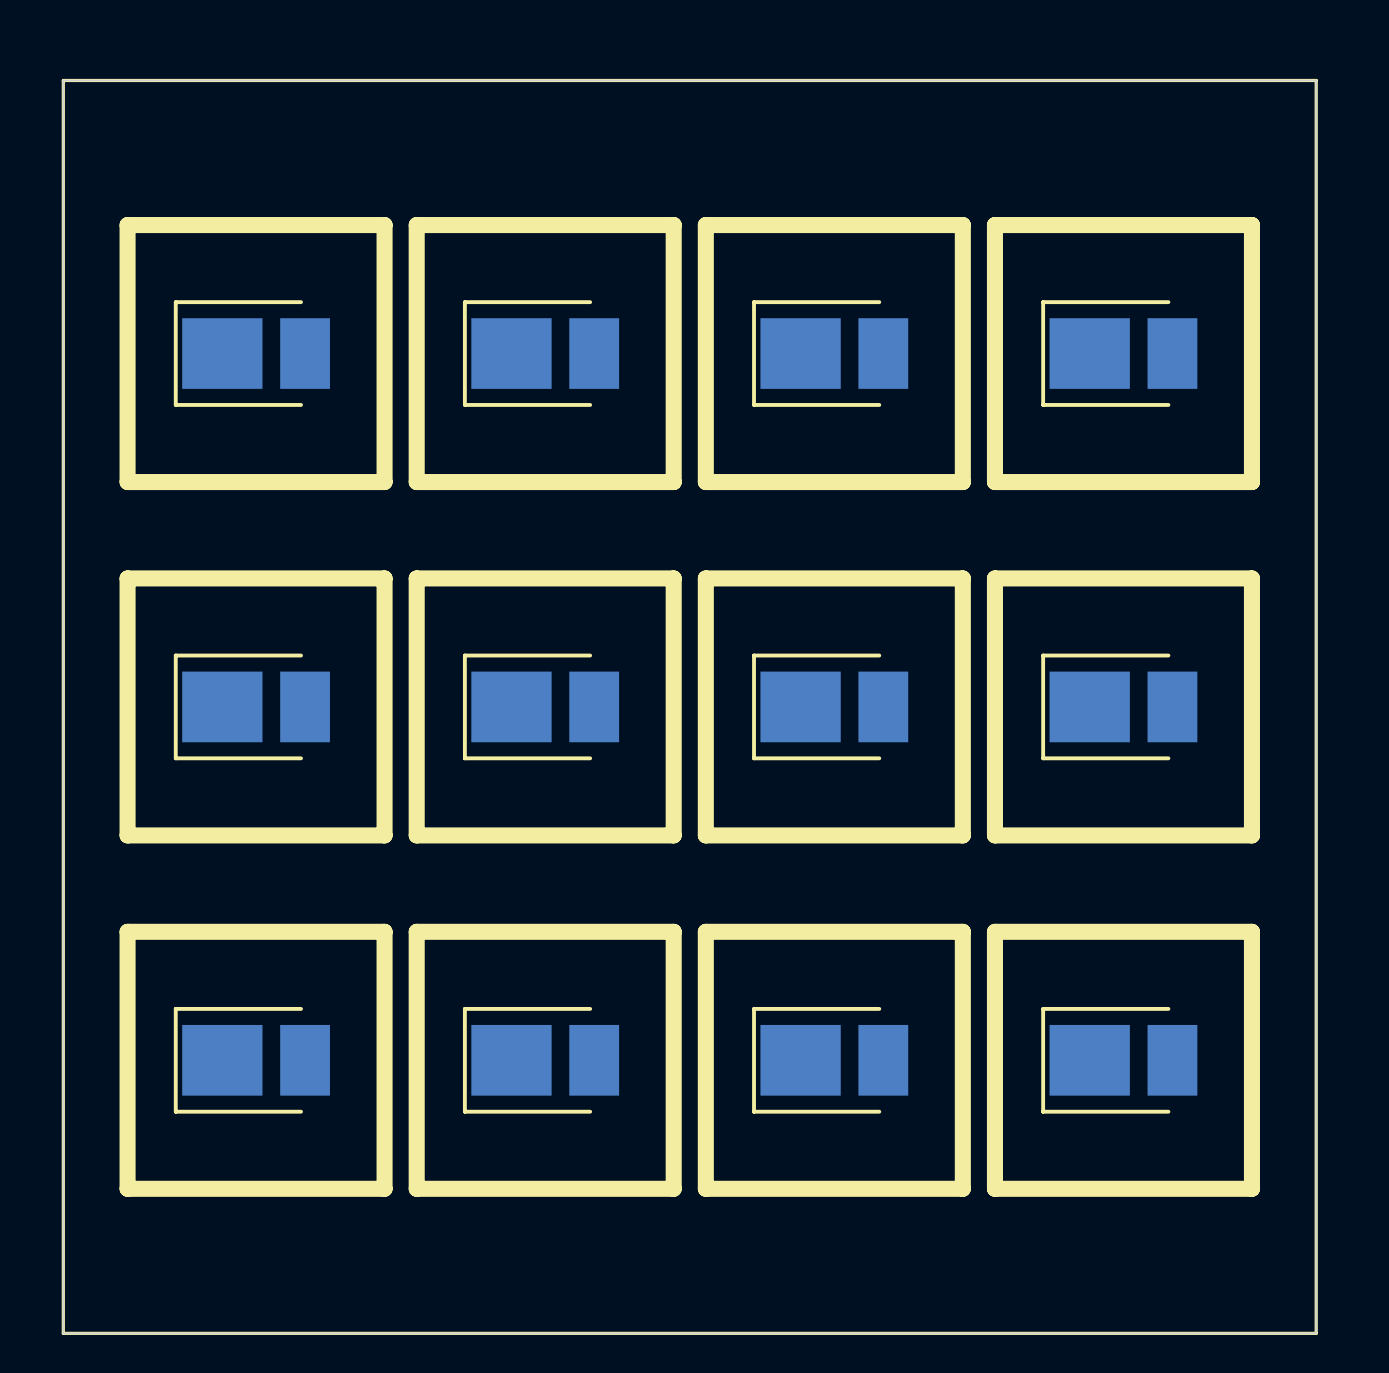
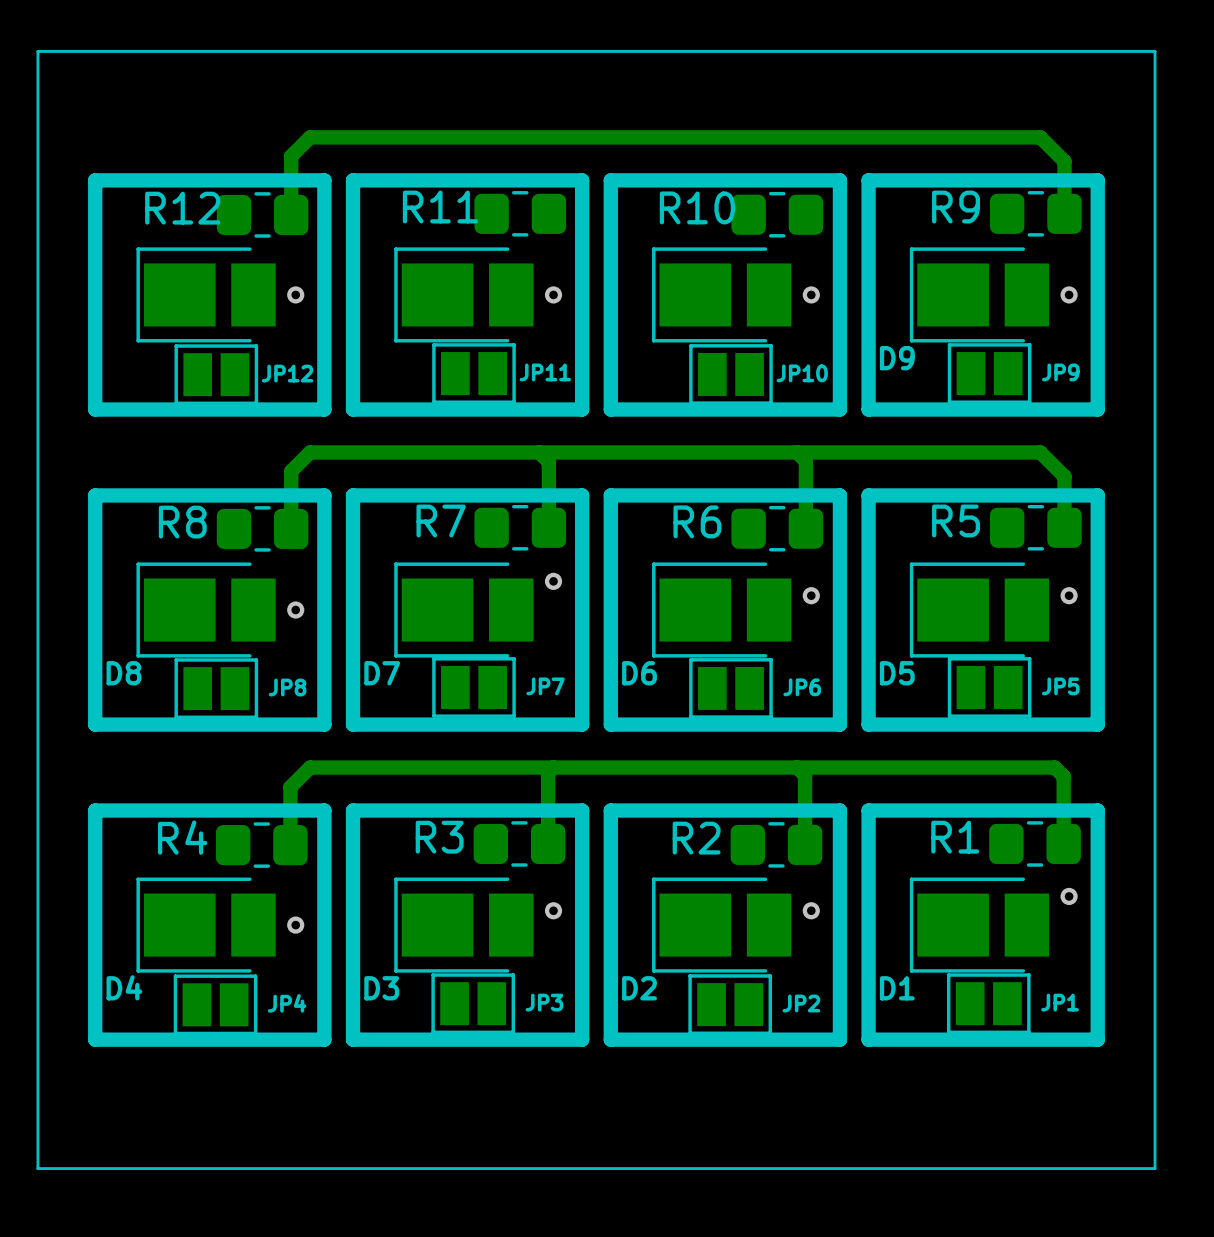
board edge: (1316, 80) (63, 80) (63, 1333) (1316, 1333) (1316, 80) -> none
R11: none -> (520, 213)
R9: none -> (1035, 213)
track: none -> (1064, 213) (1064, 161) (1040, 137) (310, 137) (291, 156) (291, 214)
R12: none -> (262, 214)
R10: none -> (777, 214)
via: none -> (295, 294)
via: none -> (553, 294)
via: none -> (811, 294)
via: none -> (1069, 294)
D9 name: none -> D9 (897, 358)
JP11: none -> (474, 373)
JP9: none -> (989, 373)
JP12: none -> (216, 374)
JP10: none -> (730, 374)
track: none -> (539, 452) (548, 462) (548, 527)
track: none -> (796, 452) (805, 461) (805, 528)
R7: none -> (520, 527)
R5: none -> (1035, 527)
track: none -> (1064, 527) (1064, 476) (1040, 452) (310, 452) (291, 471) (291, 528)
R8: none -> (262, 528)
R6: none -> (777, 528)
via: none -> (553, 581)
via: none -> (811, 595)
via: none -> (1069, 595)
via: none -> (295, 610)
D8 name: none -> D8 (123, 673)
D7 name: none -> D7 (382, 673)
D6 name: none -> D6 (639, 673)
D5 name: none -> D5 (897, 673)
JP7: none -> (474, 687)
JP5: none -> (989, 687)
JP6: none -> (730, 688)
JP8: none -> (216, 688)
track: none -> (553, 767) (548, 772) (548, 843)
track: none -> (796, 767) (805, 775) (805, 844)
R3: none -> (519, 843)
R1: none -> (1035, 843)
track: none -> (1063, 843) (1063, 776) (1054, 767) (310, 767) (290, 787) (290, 845)
R4: none -> (261, 845)
R2: none -> (776, 844)
via: none -> (1069, 896)
via: none -> (553, 910)
via: none -> (811, 910)
via: none -> (295, 925)
D4 name: none -> D4 (124, 987)
D3 name: none -> D3 (381, 988)
D2 name: none -> D2 (639, 988)
D1 name: none -> D1 (897, 988)
JP3: none -> (473, 1003)
JP1: none -> (988, 1003)
JP4: none -> (215, 1004)
JP2: none -> (730, 1004)

